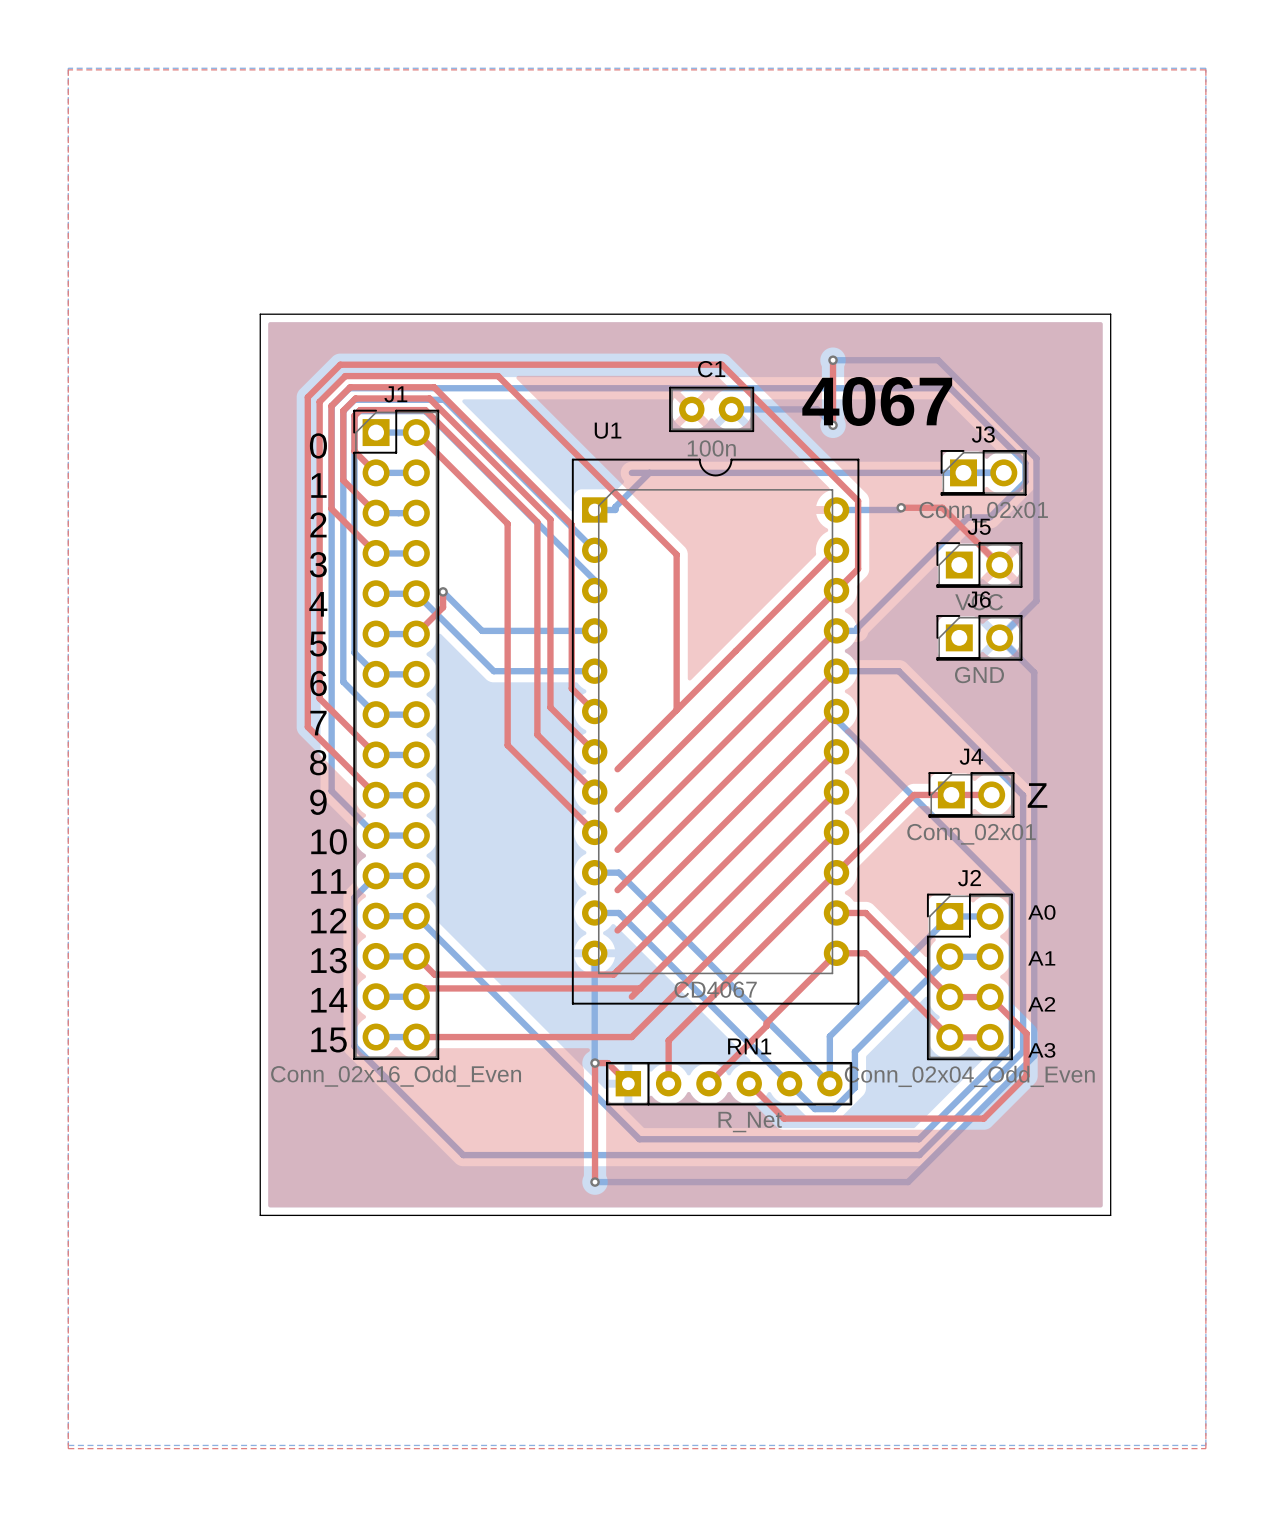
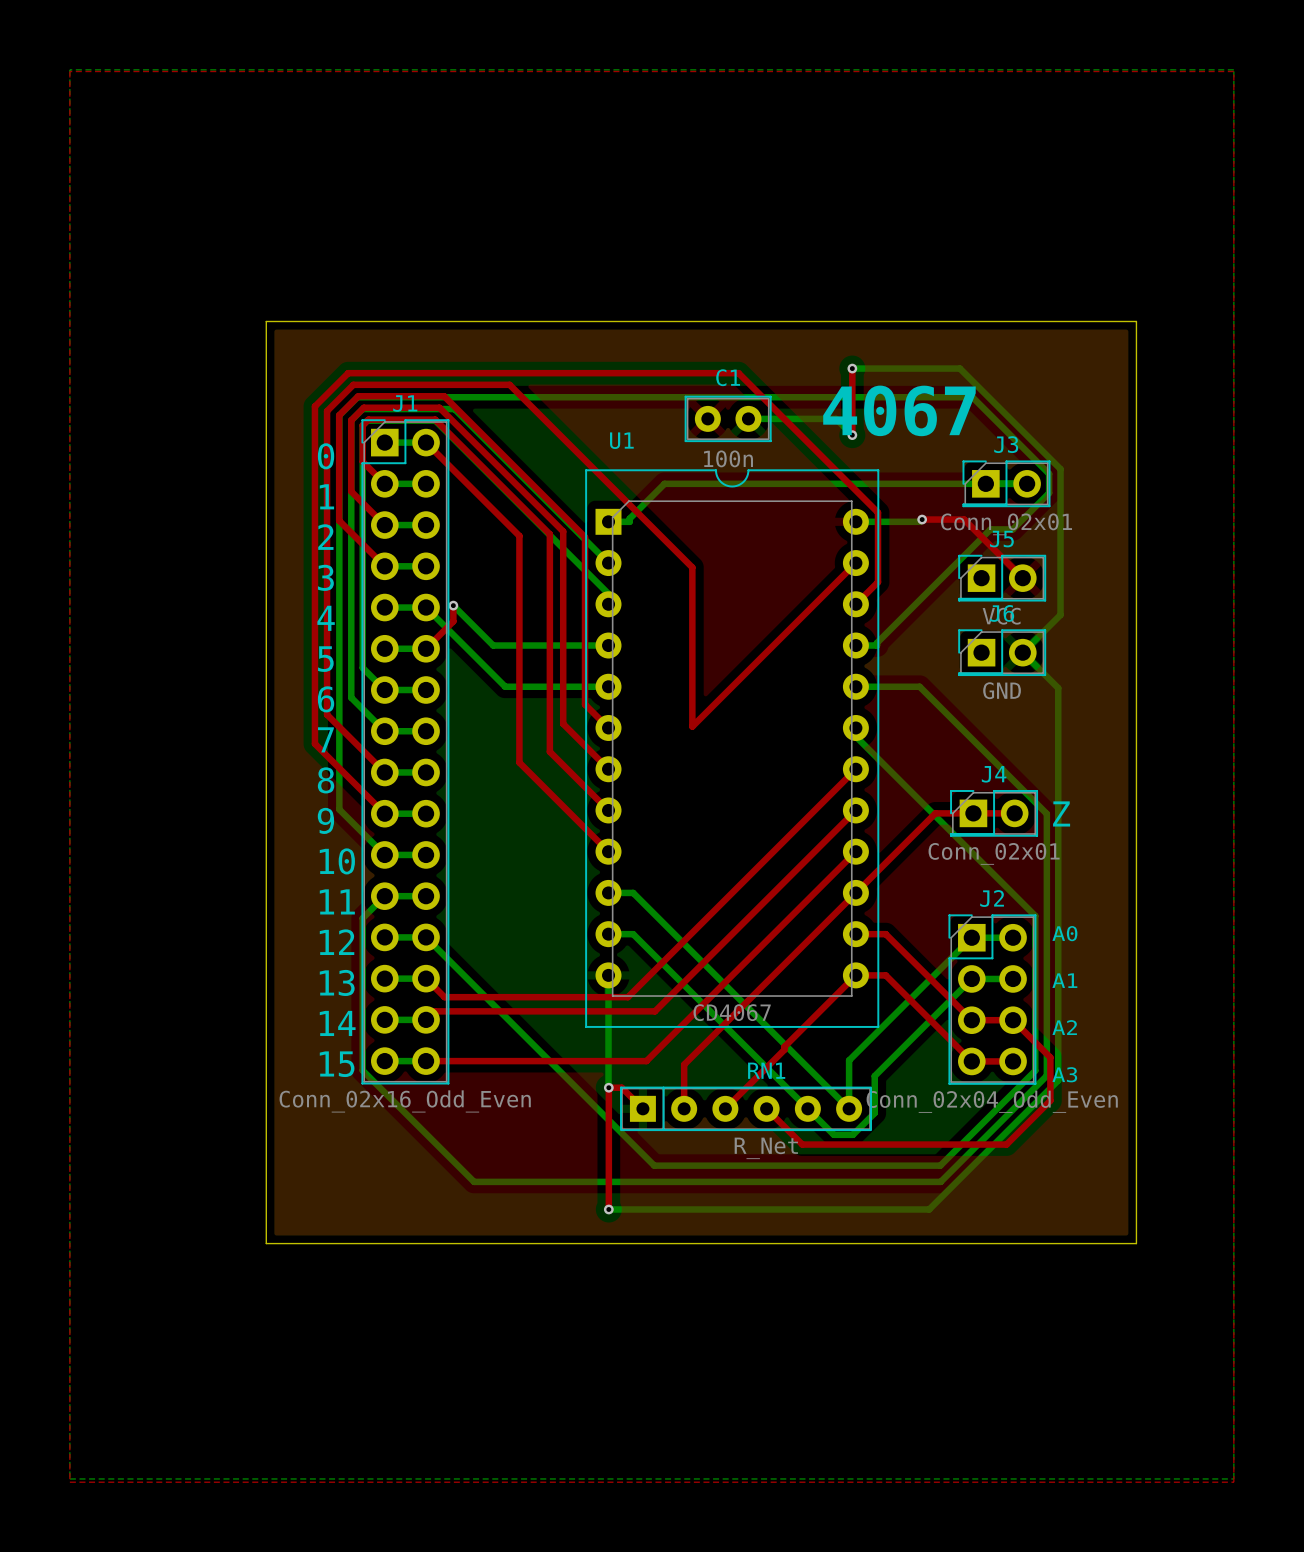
bottom track: (631, 472) (649, 472) -> none
top track: (836, 590) (617, 809) -> none
top track: (836, 630) (617, 849) -> none
top track: (836, 671) (617, 890) -> none
top track: (676, 710) (617, 769) -> none
top track: (836, 711) (617, 930) -> none
top track: (640, 988) (631, 996) -> none

